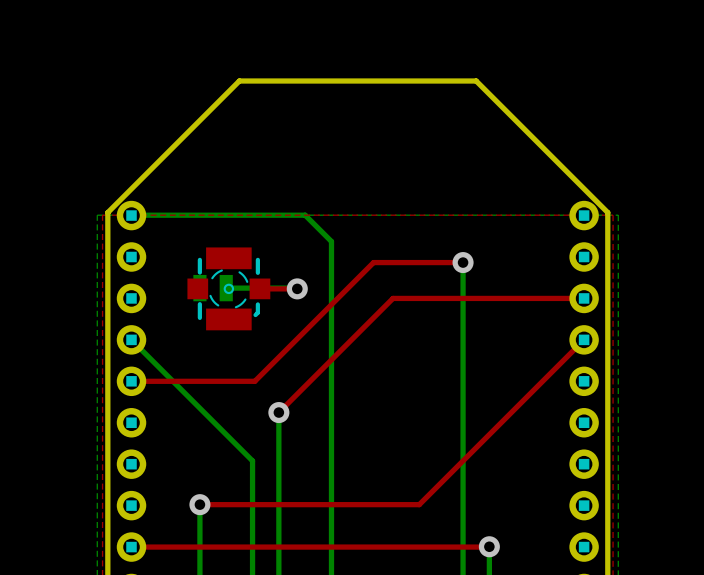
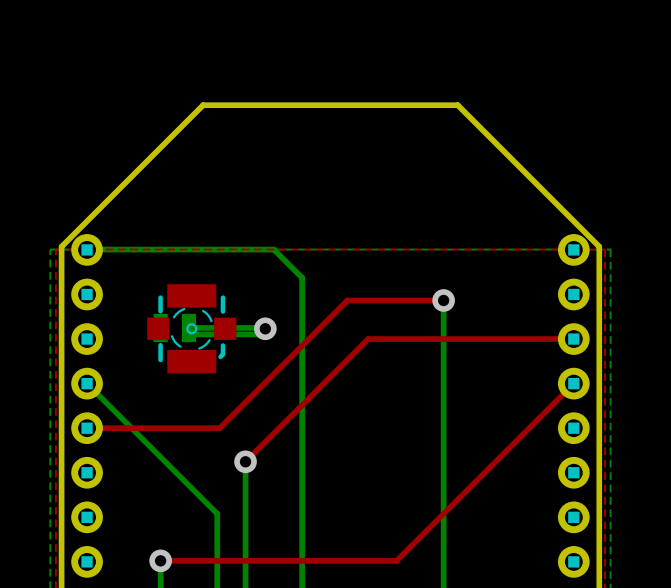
top track: (259, 288) (297, 288) -> none
bottom track: none -> (191, 334) (262, 334)

